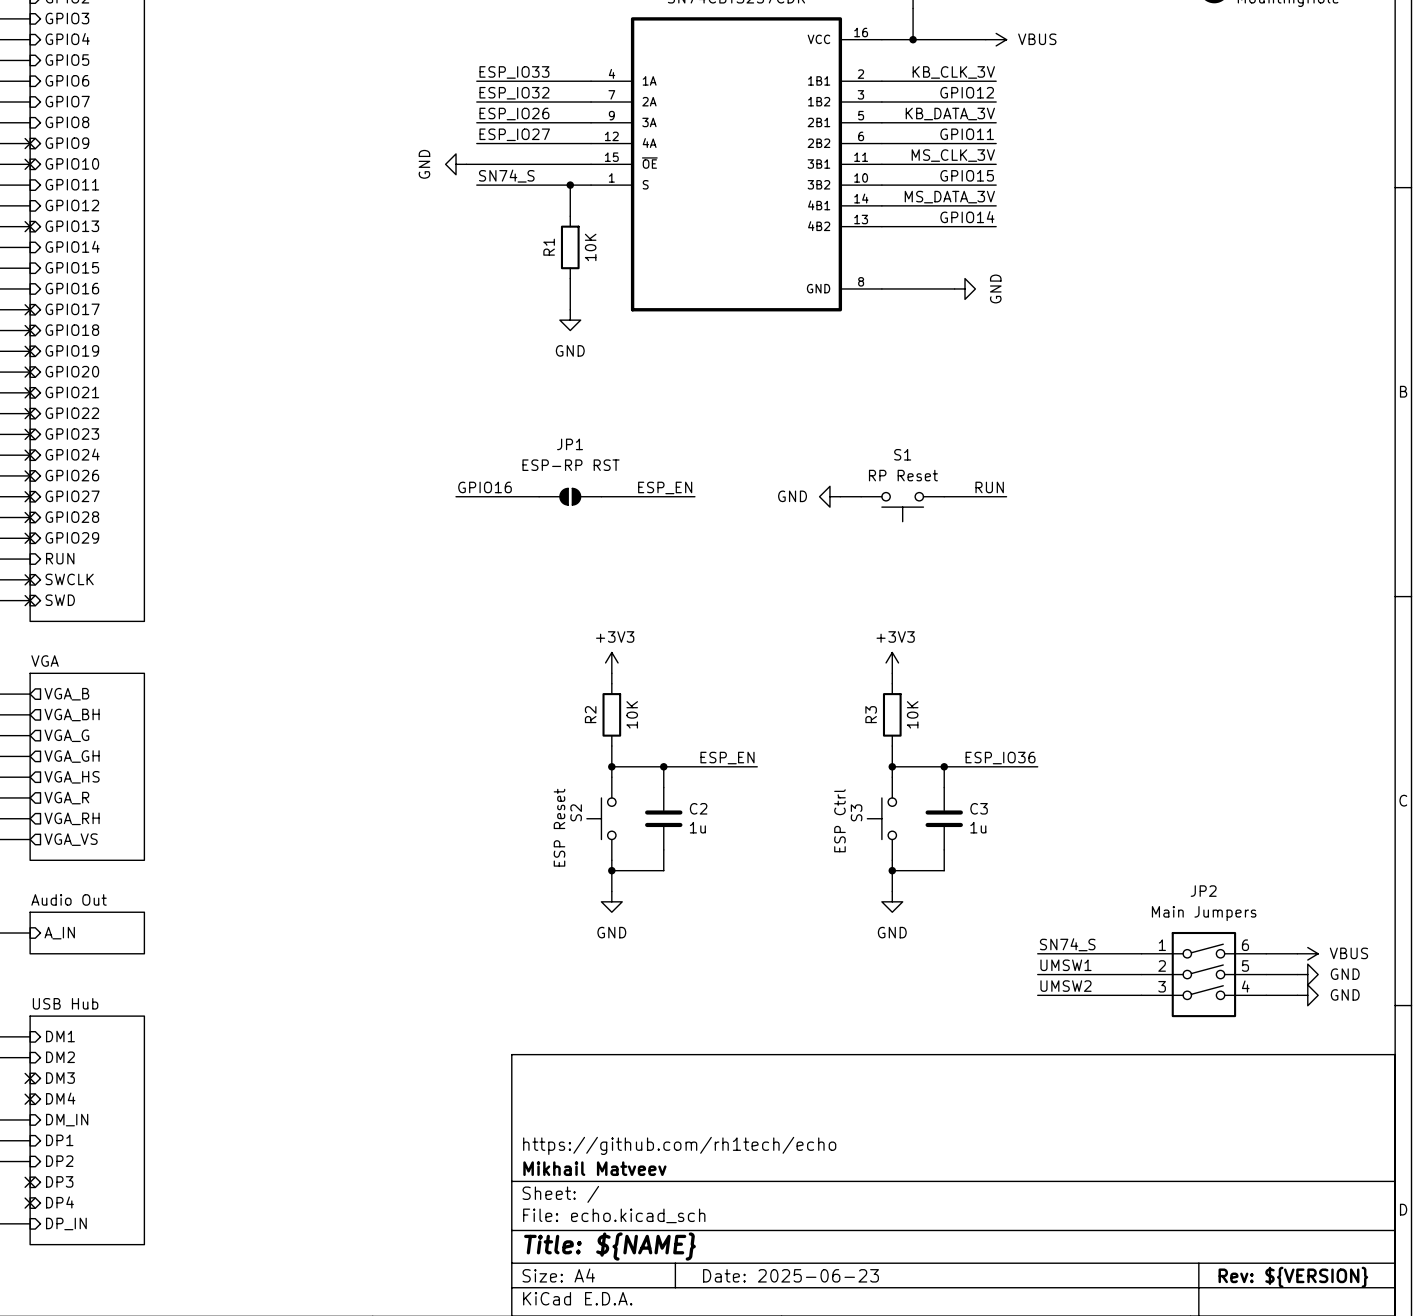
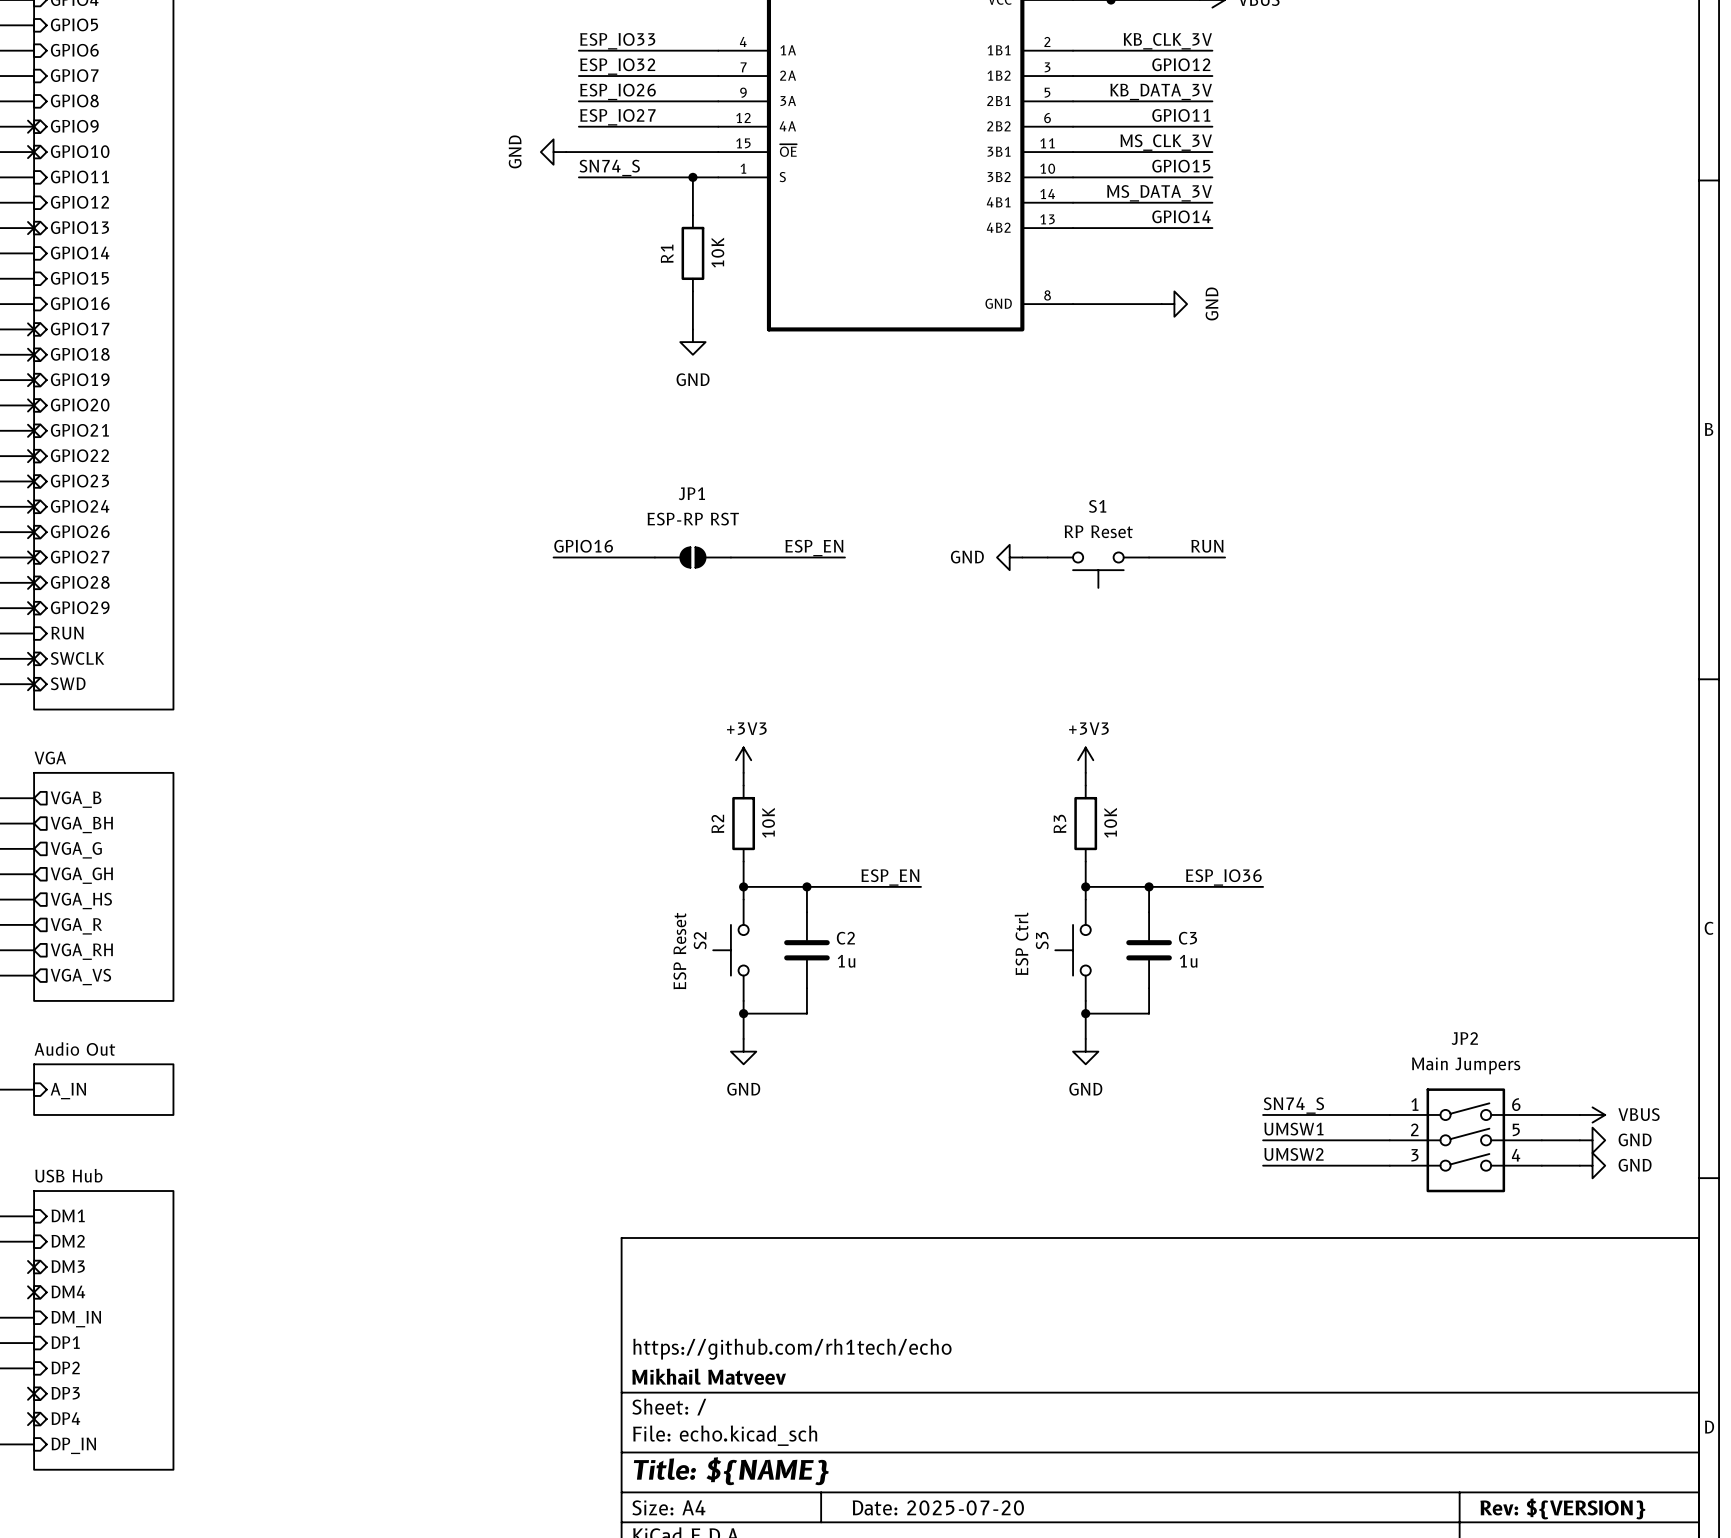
title block: Date: 2025-06-23 (791, 1275) -> Date: 2025-07-20 (938, 1507)

